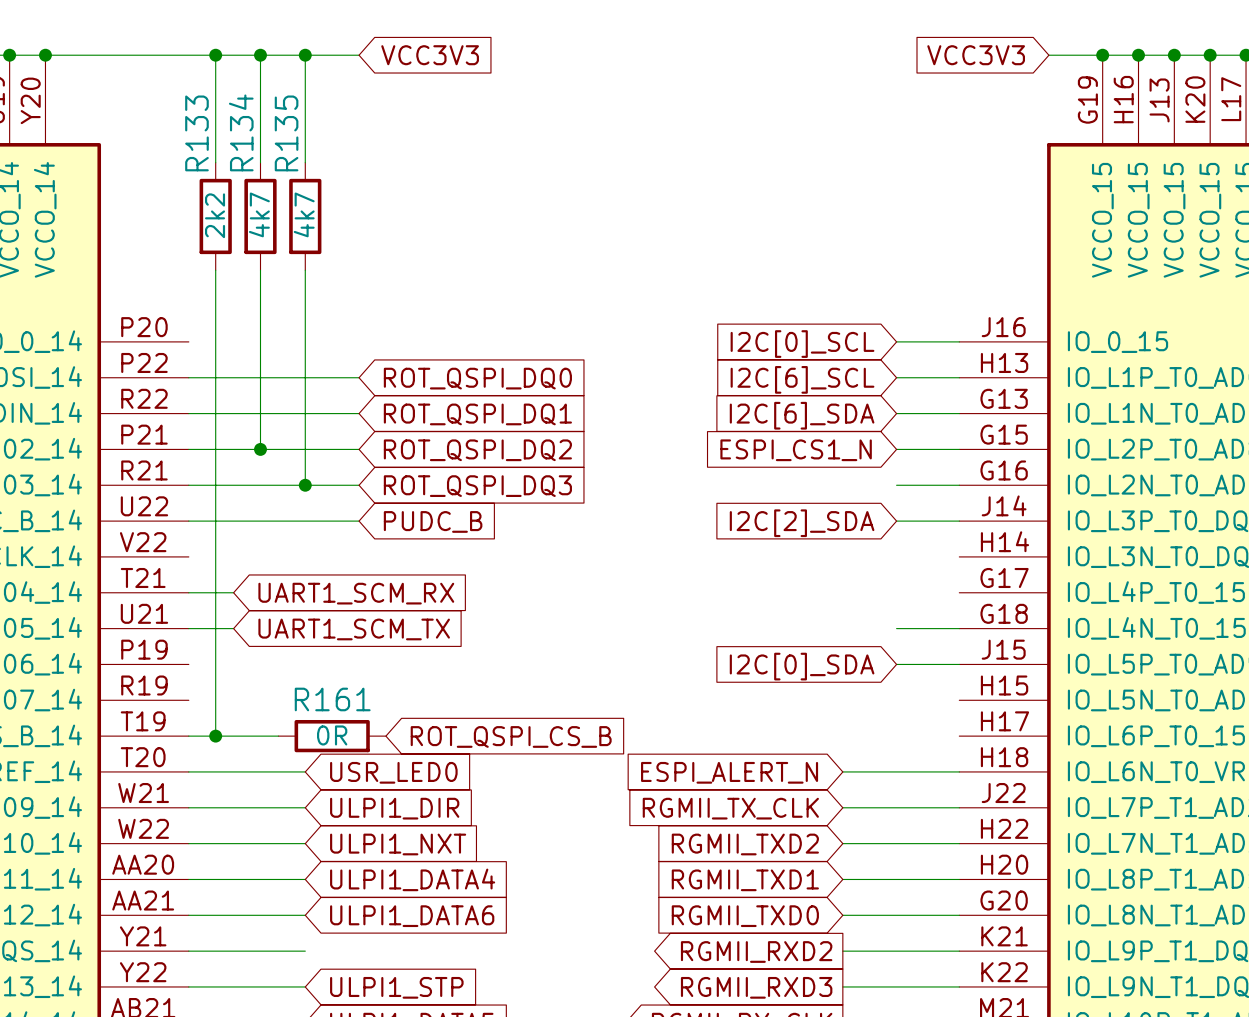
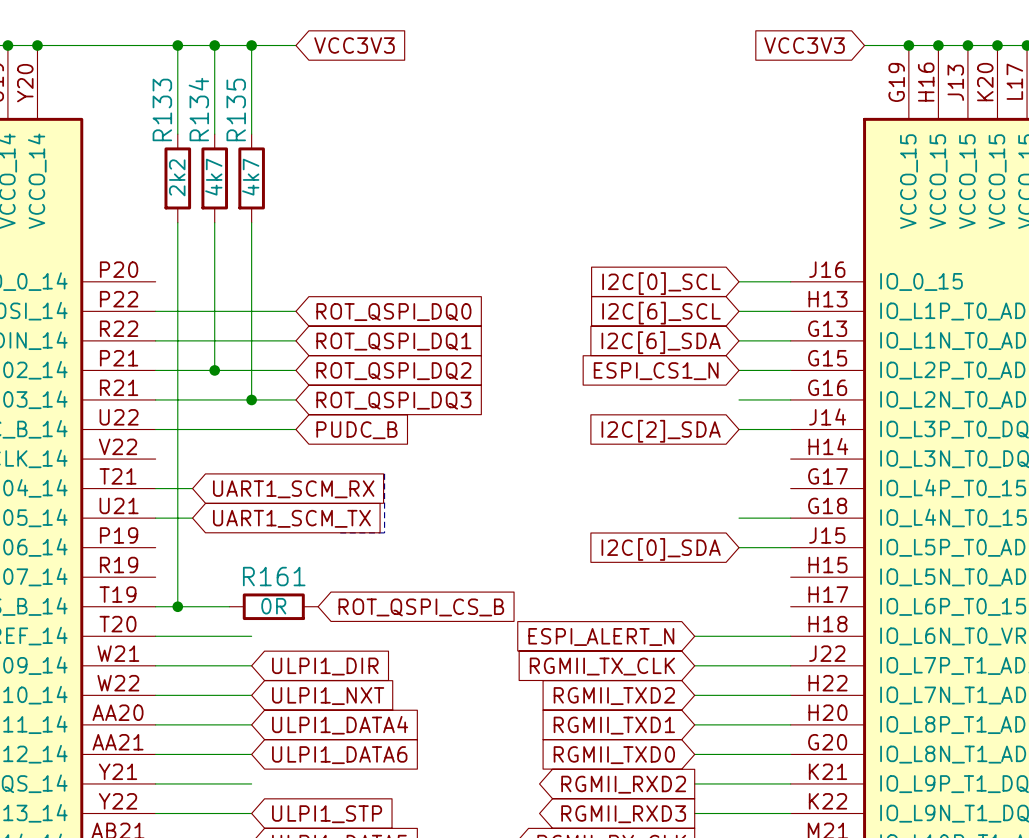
line: none -> (384, 473) (384, 532) (340, 532)
global label: USR_LED0 (393, 772) -> none

